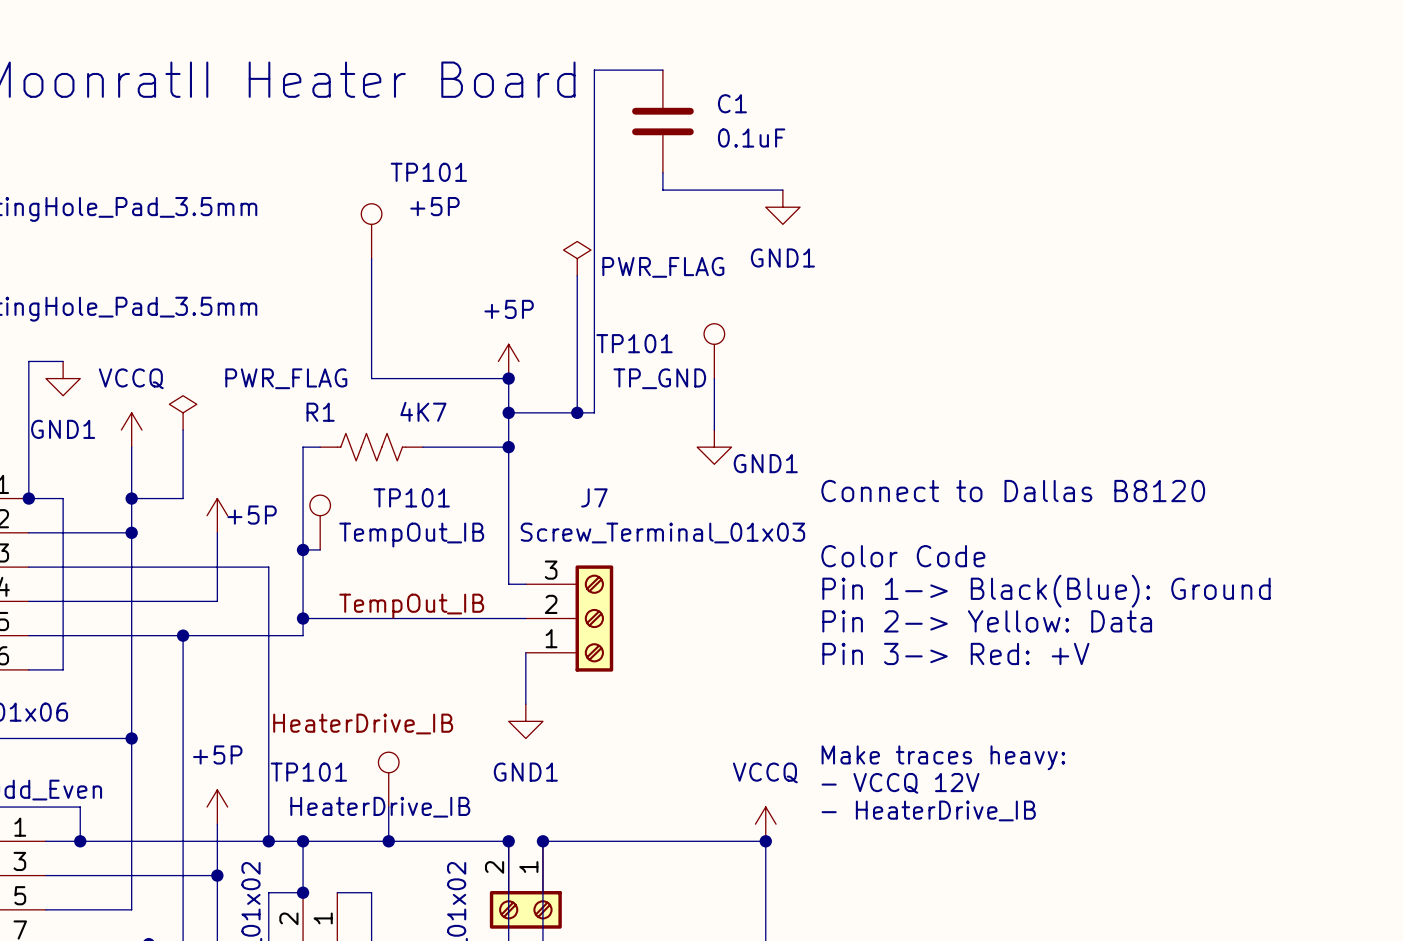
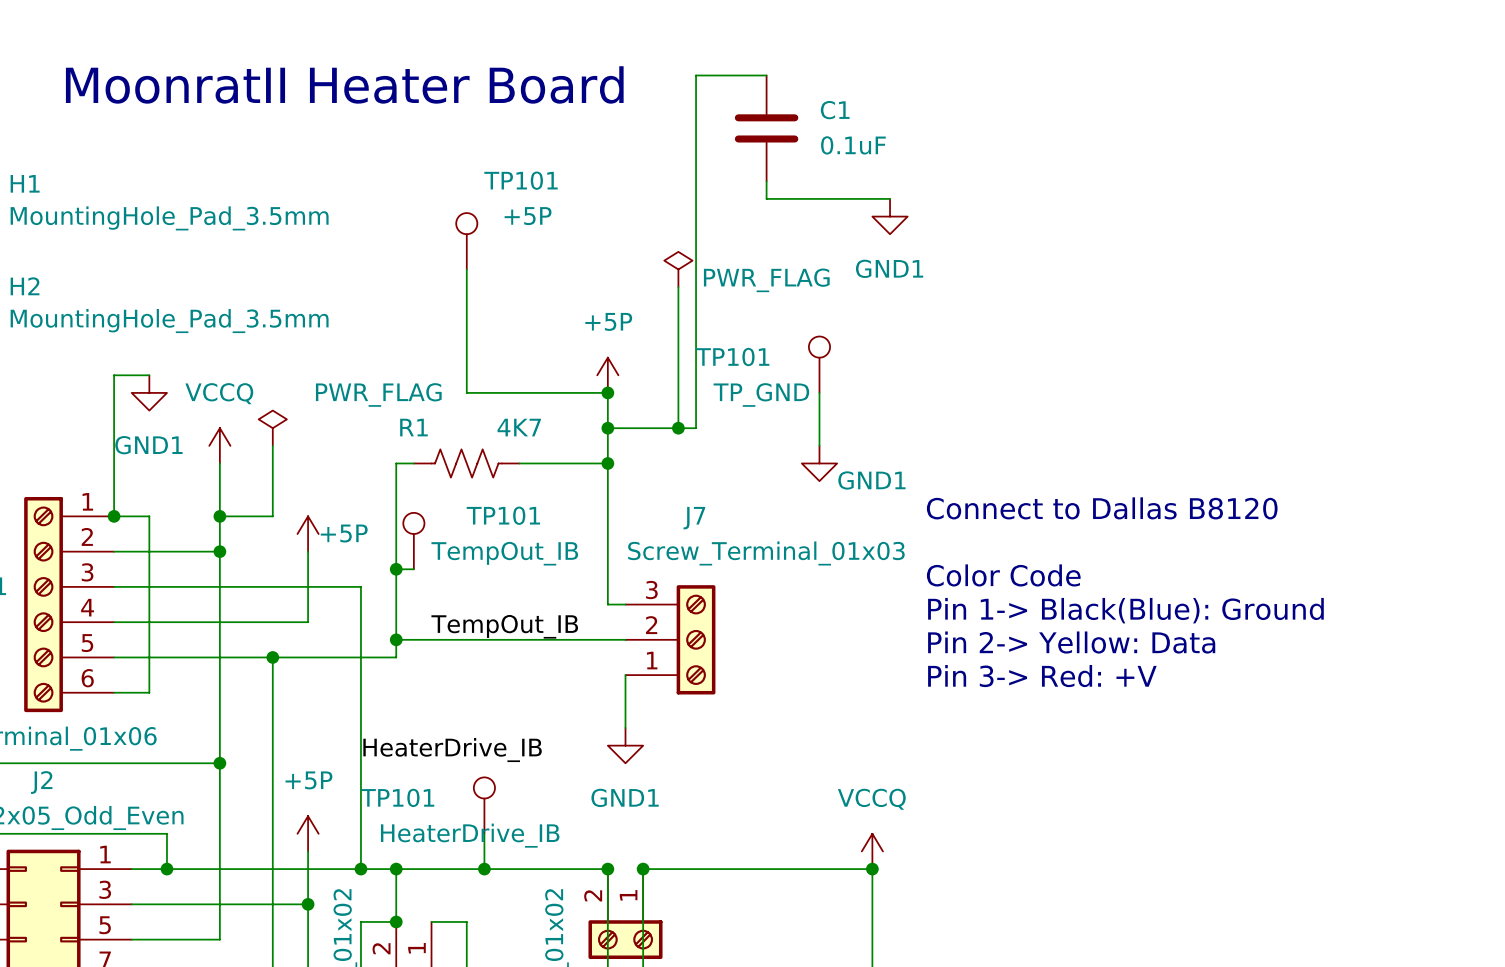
text: Make traces heavy: (943, 757) -> none
text: - VCCQ 12V (900, 783) -> none
text: - HeaterDrive_IB (928, 810) -> none

